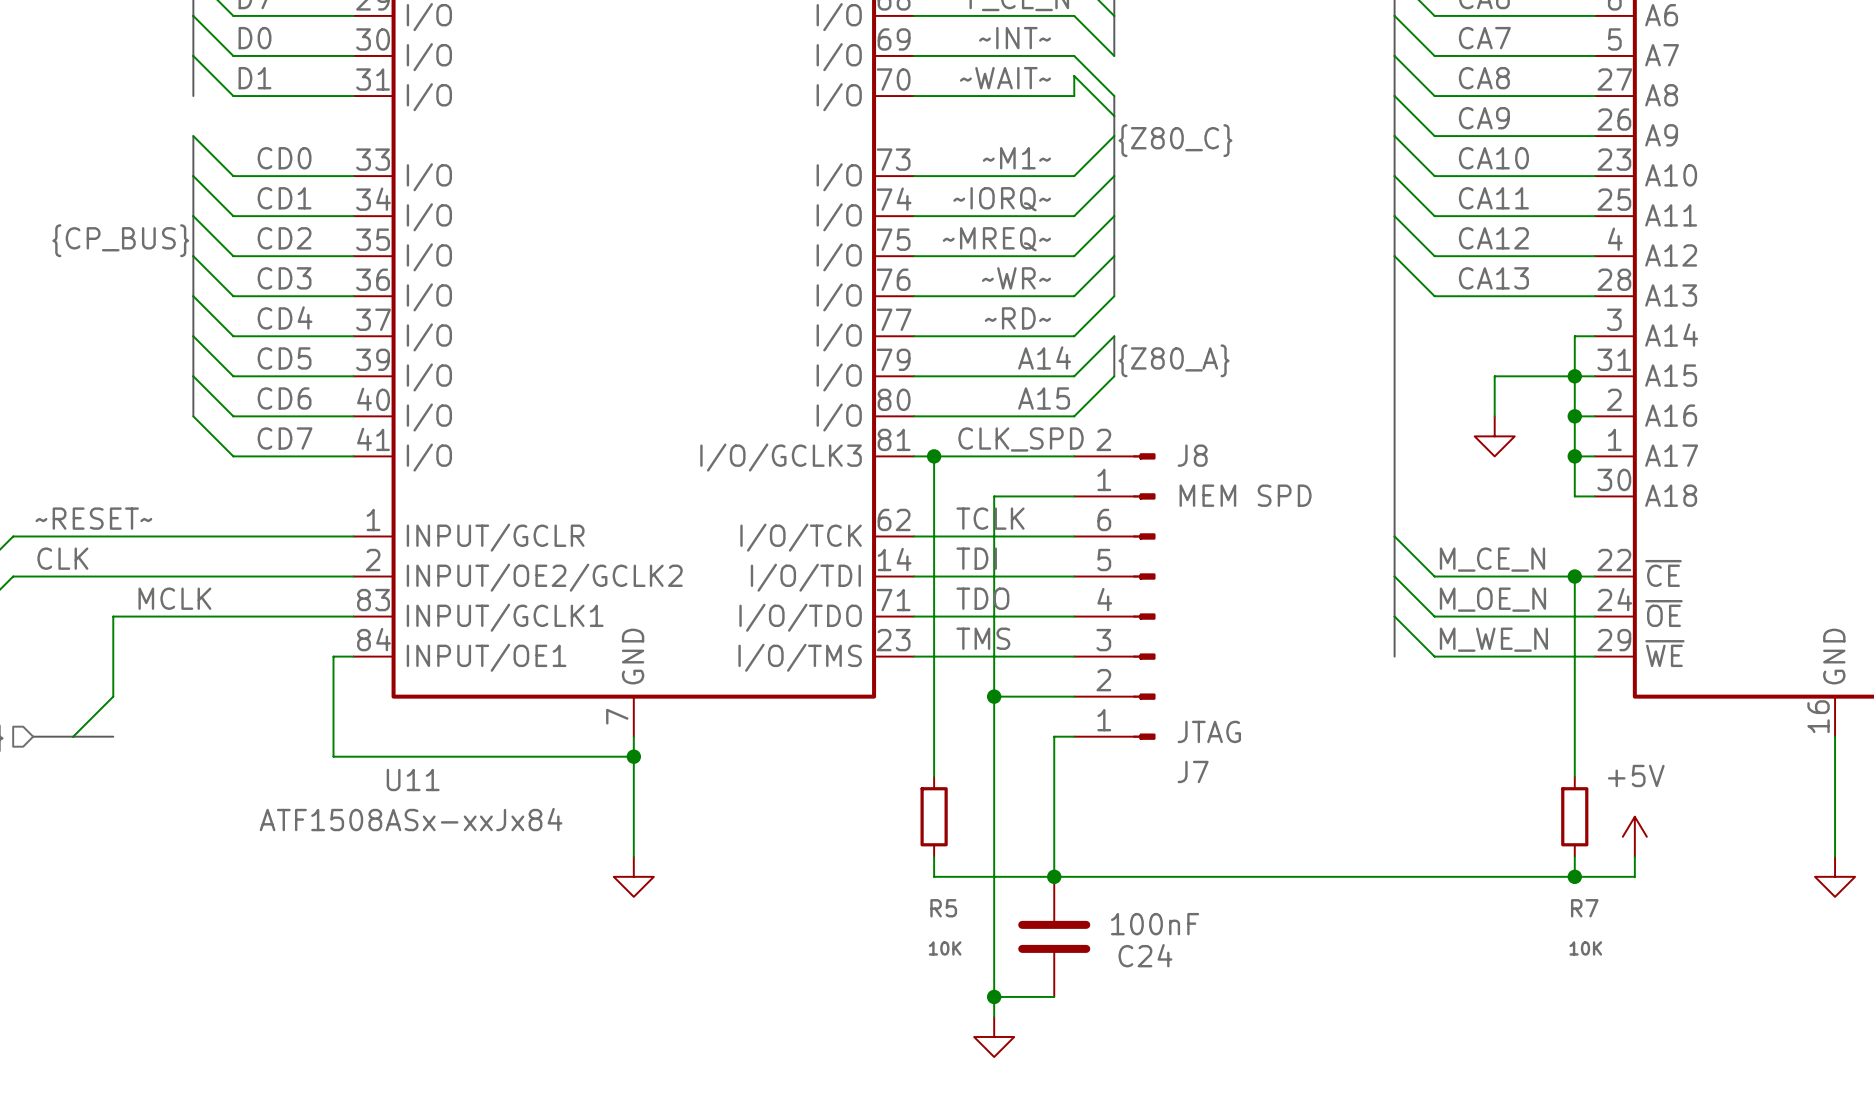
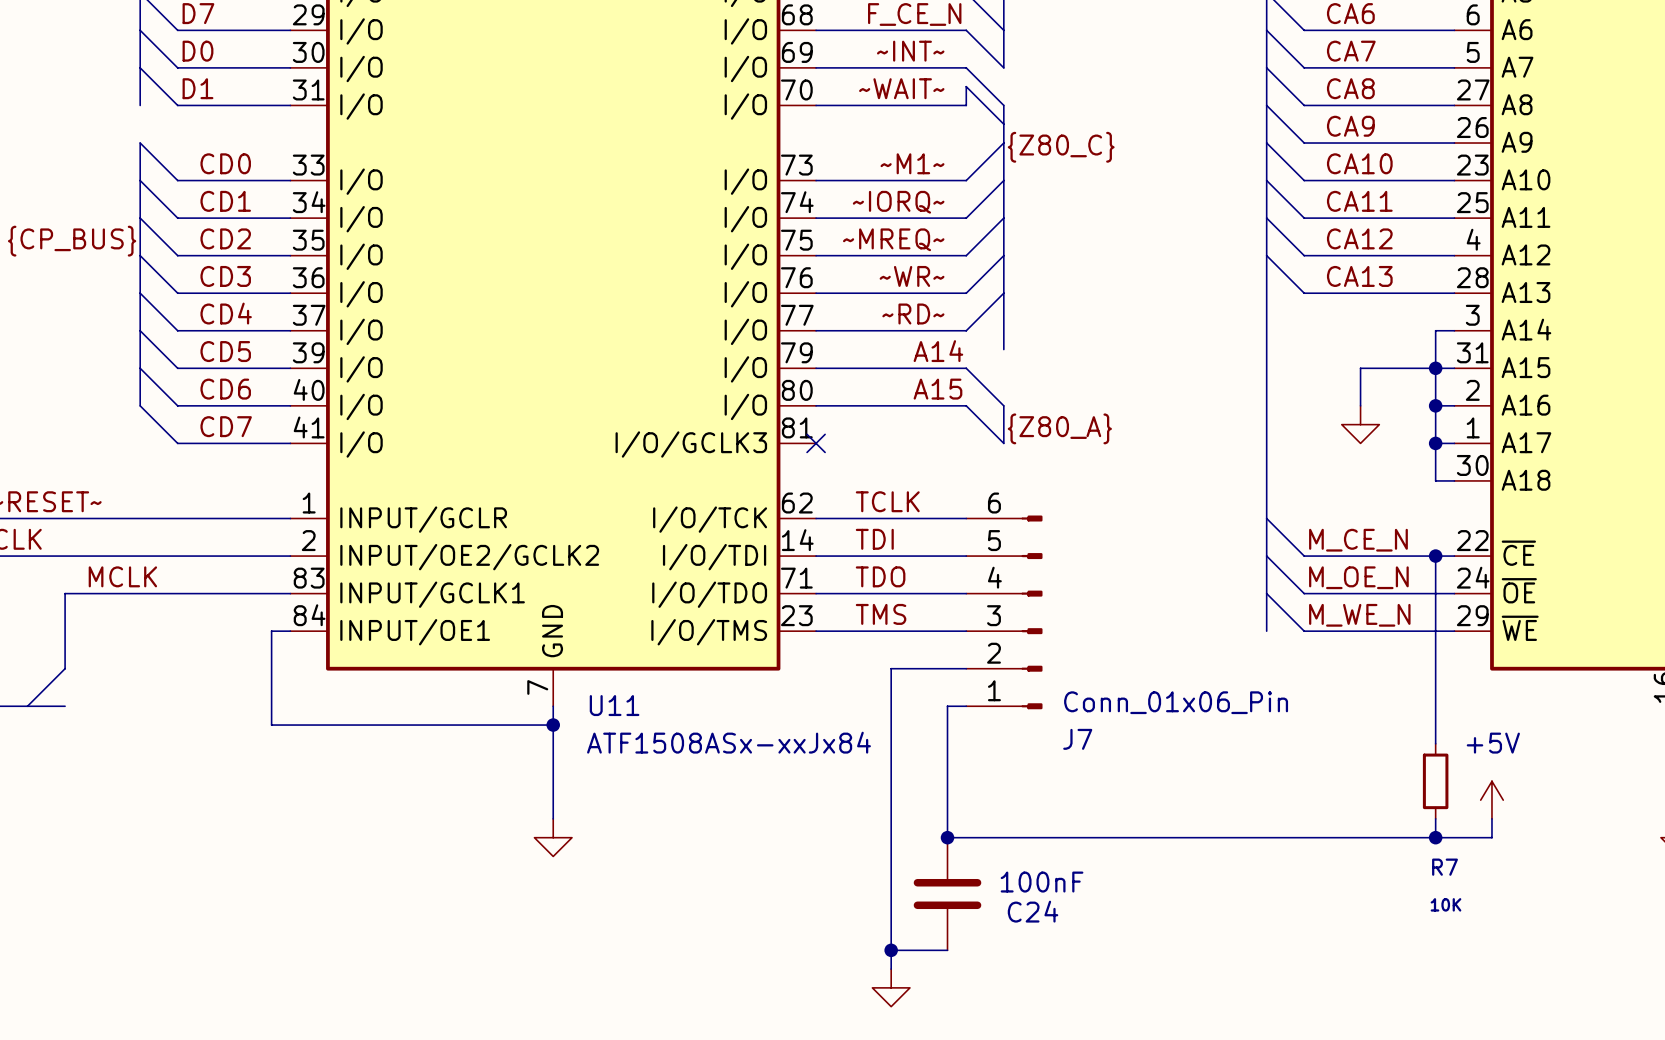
bus: none -> (1003, 293) (1003, 330)
wire: (1114, 336) (1074, 376) -> (1003, 405) (966, 368)
bus: (1114, 356) (1114, 376) -> none
label position: {Z80_A} (1174, 360) -> {Z80_A} (1059, 428)
wire: (1114, 376) (1074, 416) -> (1003, 443) (966, 405)
bus: none -> (1003, 405) (1003, 443)
label: CLK_SPD (1021, 439) -> none
wire: (914, 456) (1074, 456) -> none
no-connect mark: none -> (816, 443)
wire: (934, 456) (934, 776) -> none
junction: (934, 456) -> none
J8: MEM SPD (1114, 476) -> none
wire: (1074, 496) (994, 496) (994, 696) -> none
junction: (994, 696) -> none
J7 value: JTAG (1209, 731) -> Conn_01x06_Pin (1176, 702)
U11 name position: U11 (413, 779) -> U11 (614, 705)
R5: 10K (934, 816) -> none
U11 value position: ATF1508ASx-xxJx84 (411, 819) -> ATF1508ASx-xxJx84 (729, 742)
wire: (934, 856) (934, 876) (1054, 876) -> none

